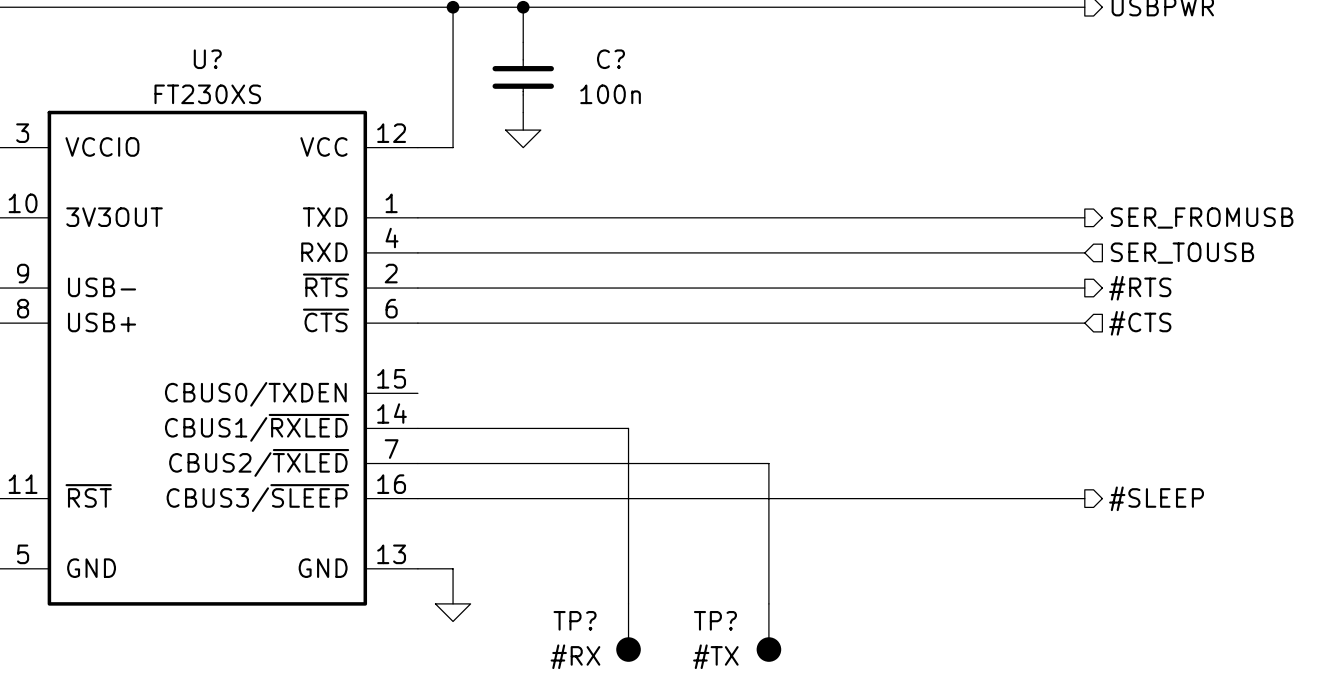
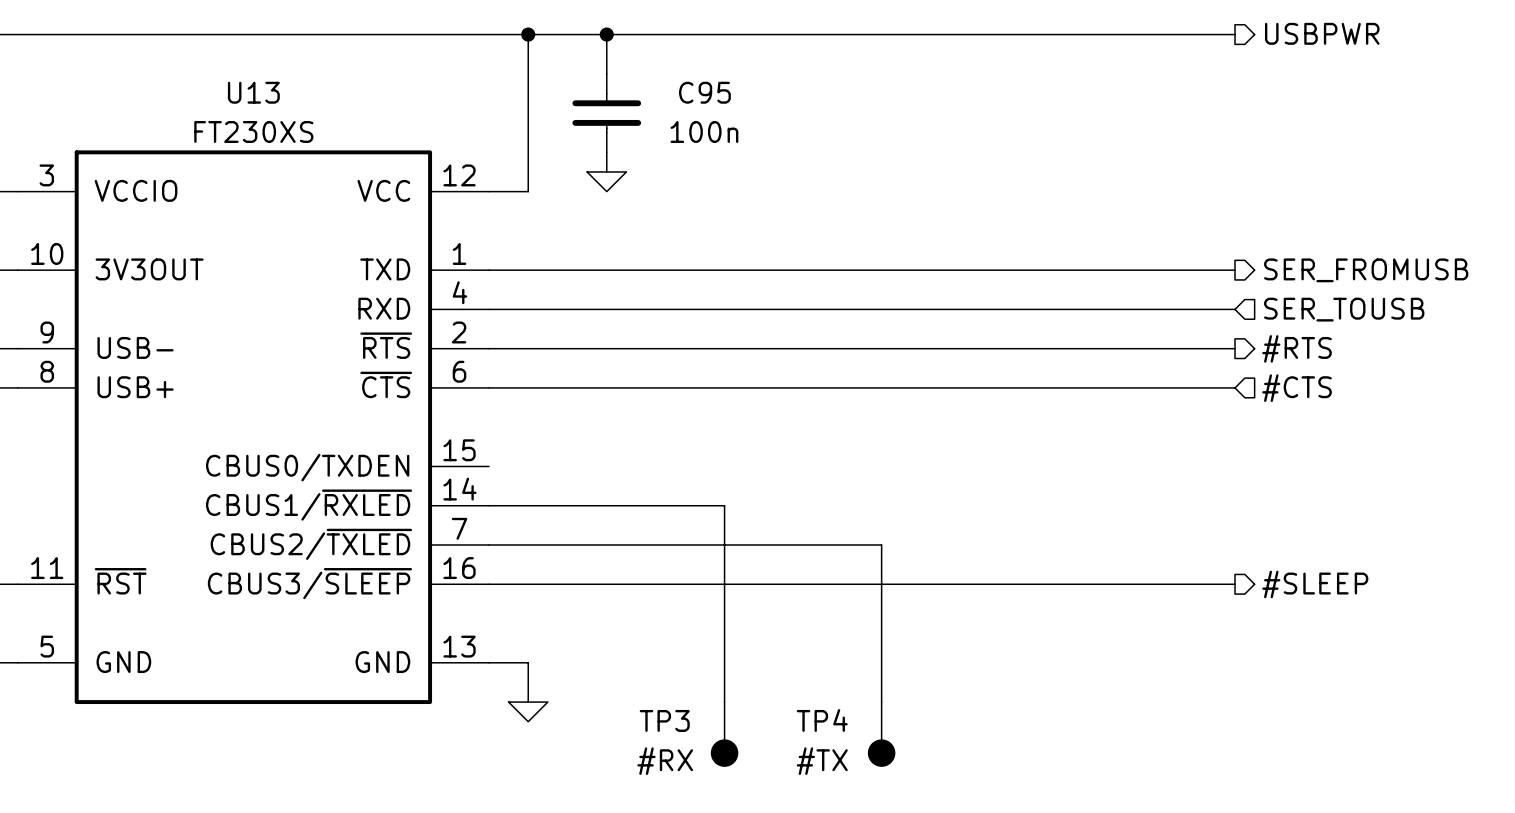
U? name: U? (207, 59) -> U13 (253, 92)
C? name: C? (610, 59) -> C95 (704, 92)
TP? name: TP? (575, 620) -> TP3 (664, 720)
TP? name: TP? (715, 620) -> TP4 (822, 720)

